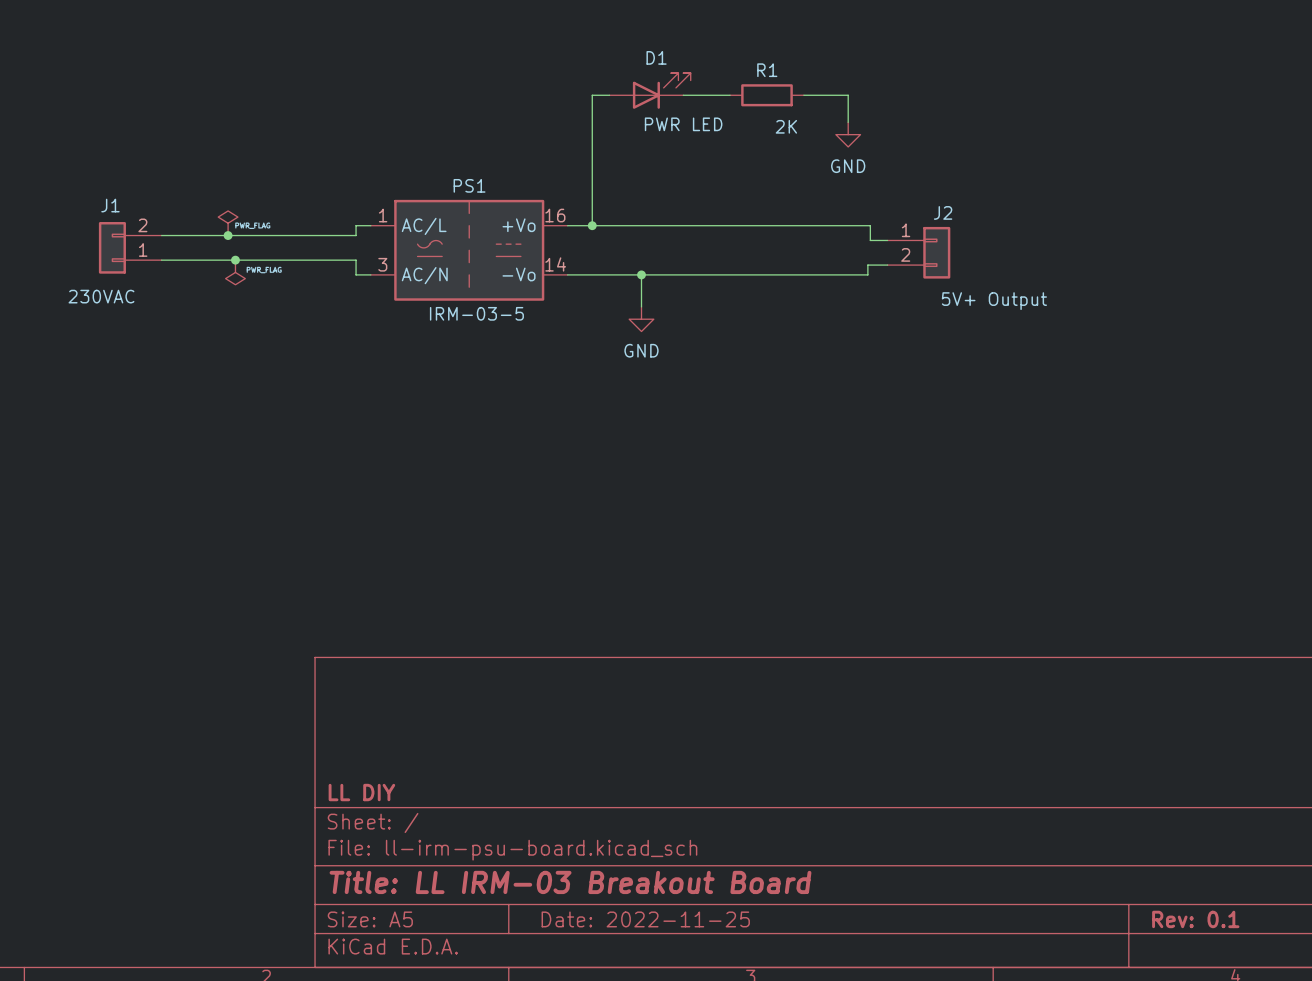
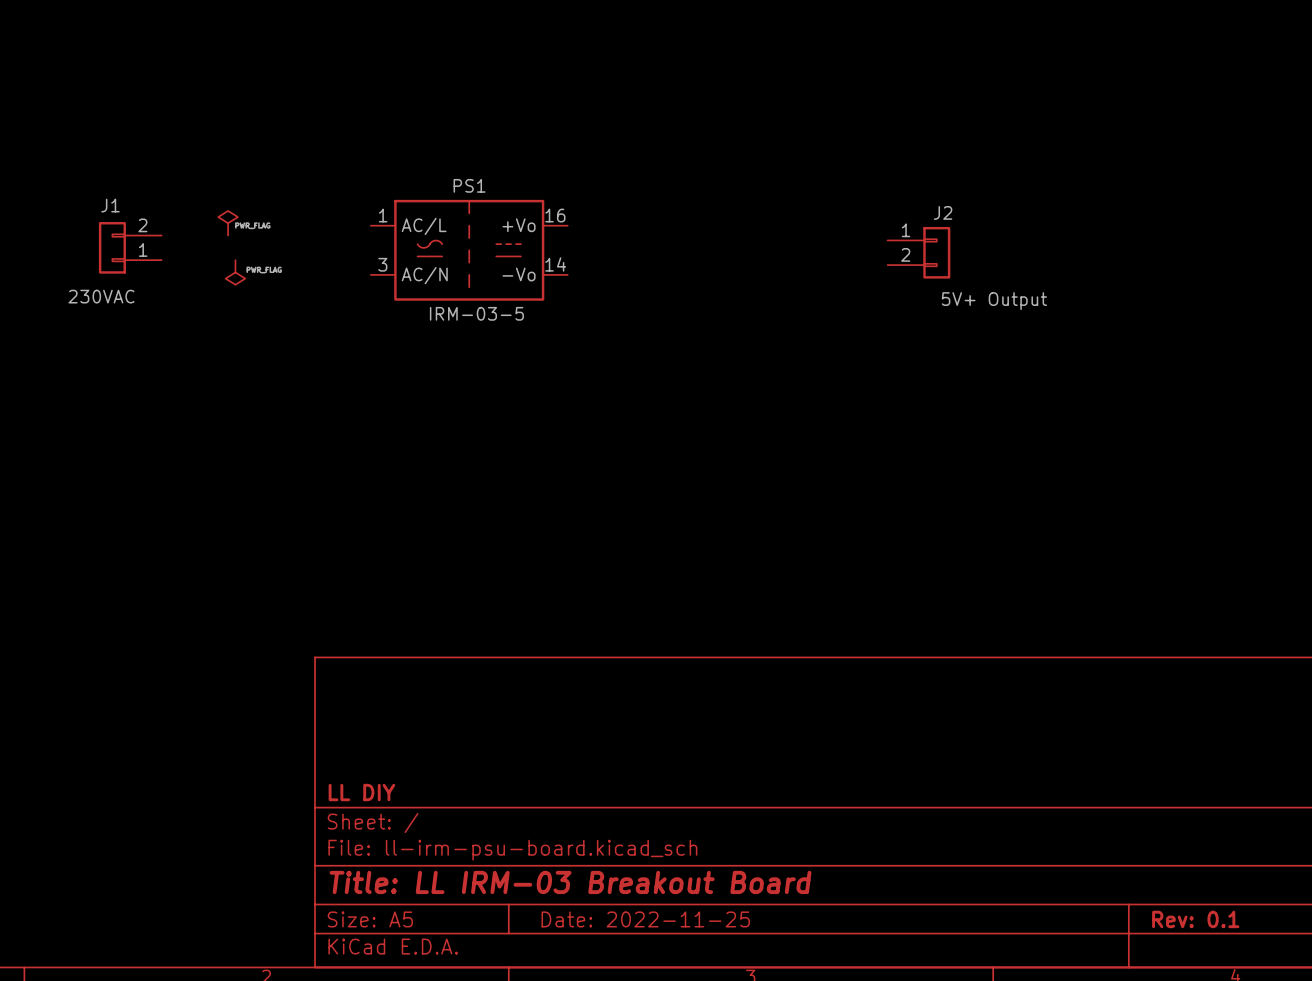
D1: PWR LED (650, 90) -> none
wire: (609, 95) (592, 95) (592, 225) -> none
wire: (683, 95) (730, 95) -> none
R1: 2K (766, 95) -> none
wire: (803, 95) (848, 95) (848, 122) -> none
power symbol: GND (848, 134) -> none
wire: (370, 225) (356, 225) (356, 235) (161, 235) -> none
wire: (567, 225) (870, 225) (870, 240) (887, 240) -> none
junction: (592, 225) -> none
junction: (228, 235) -> none
wire: (161, 260) (356, 260) (356, 274) (370, 274) -> none
junction: (235, 260) -> none
wire: (887, 265) (867, 265) (867, 274) (567, 274) -> none
wire: (641, 274) (641, 306) -> none
junction: (641, 274) -> none
power symbol: GND (641, 319) -> none

